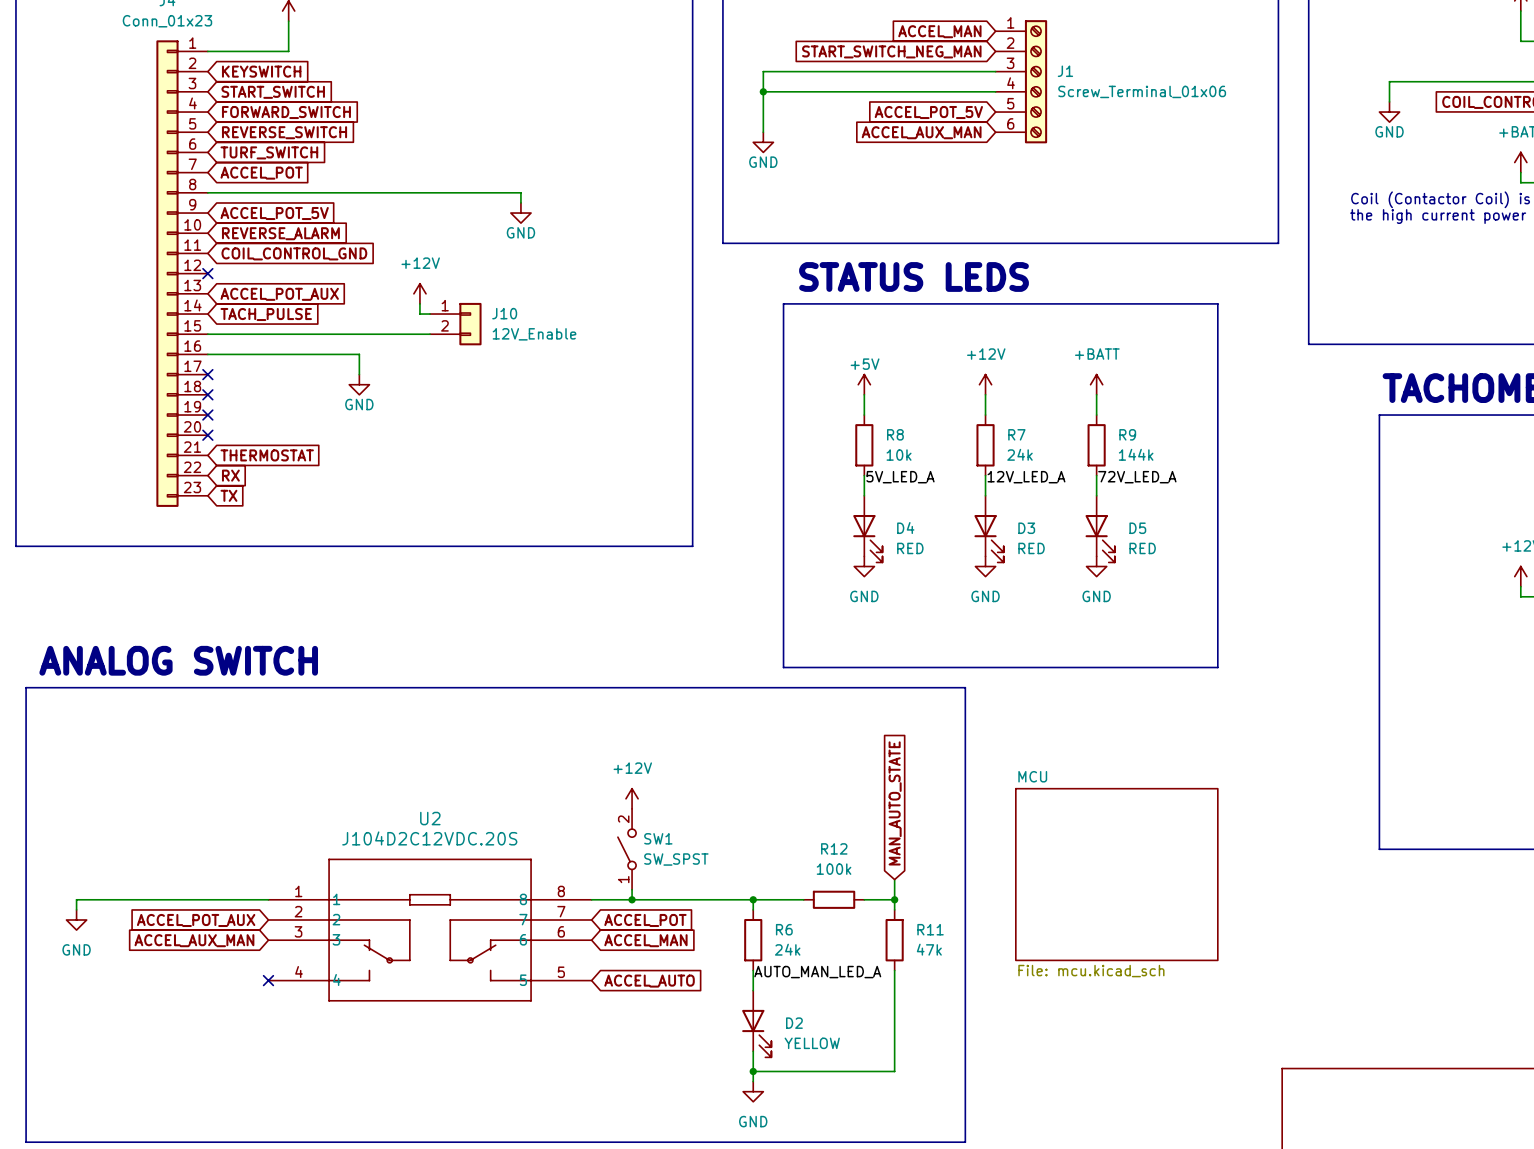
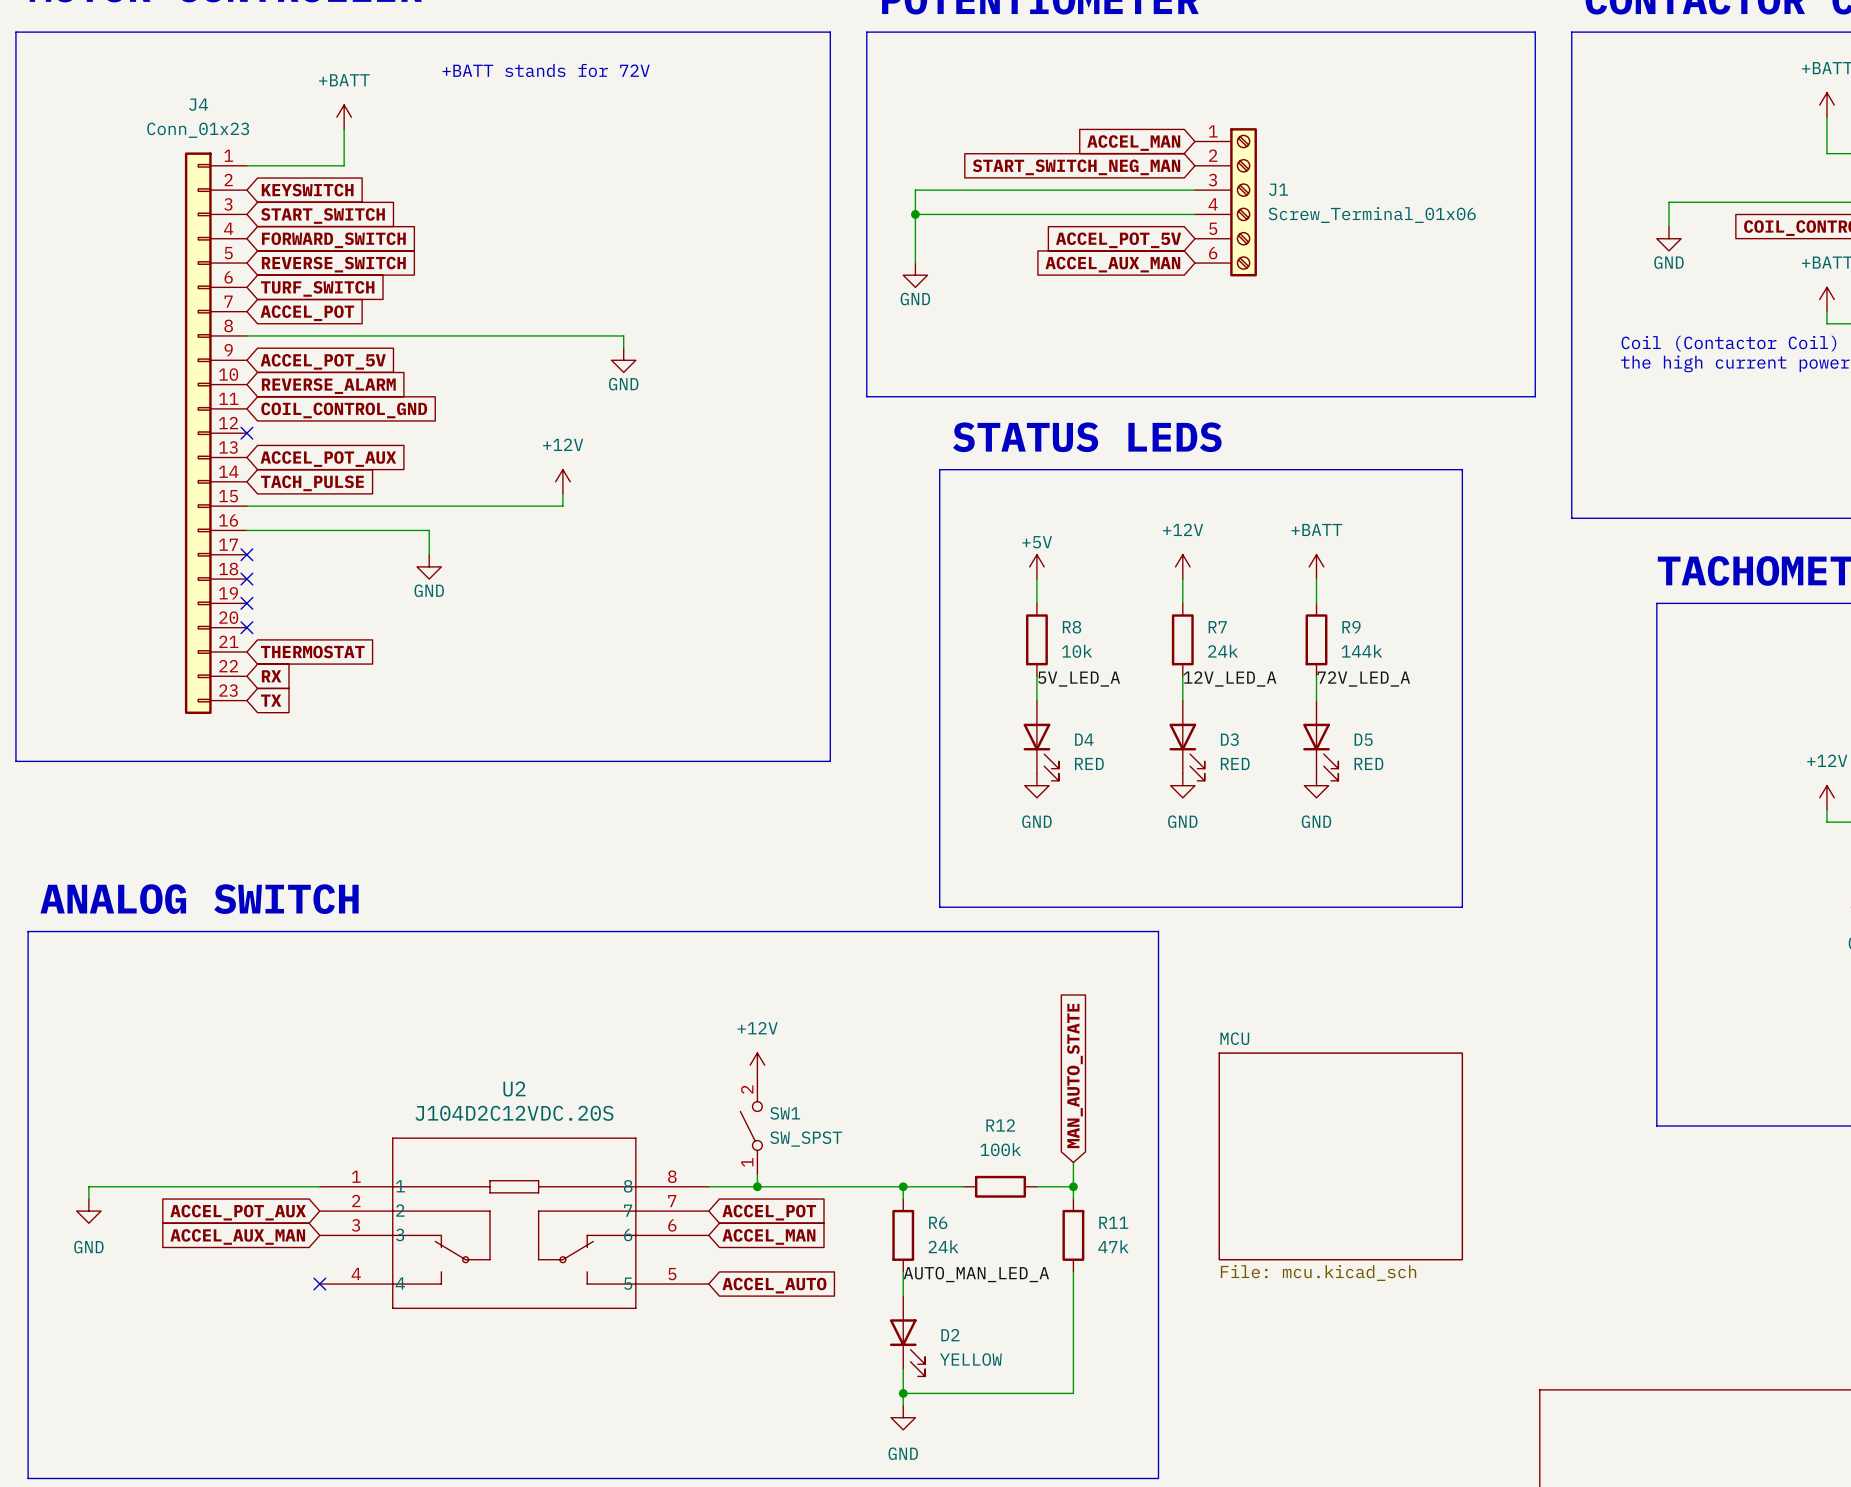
power symbol position: +12V (419, 293) -> +12V (562, 481)
wire: (419, 303) (419, 314) (430, 314) -> none
J10: 12V_Enable (455, 324) -> none

